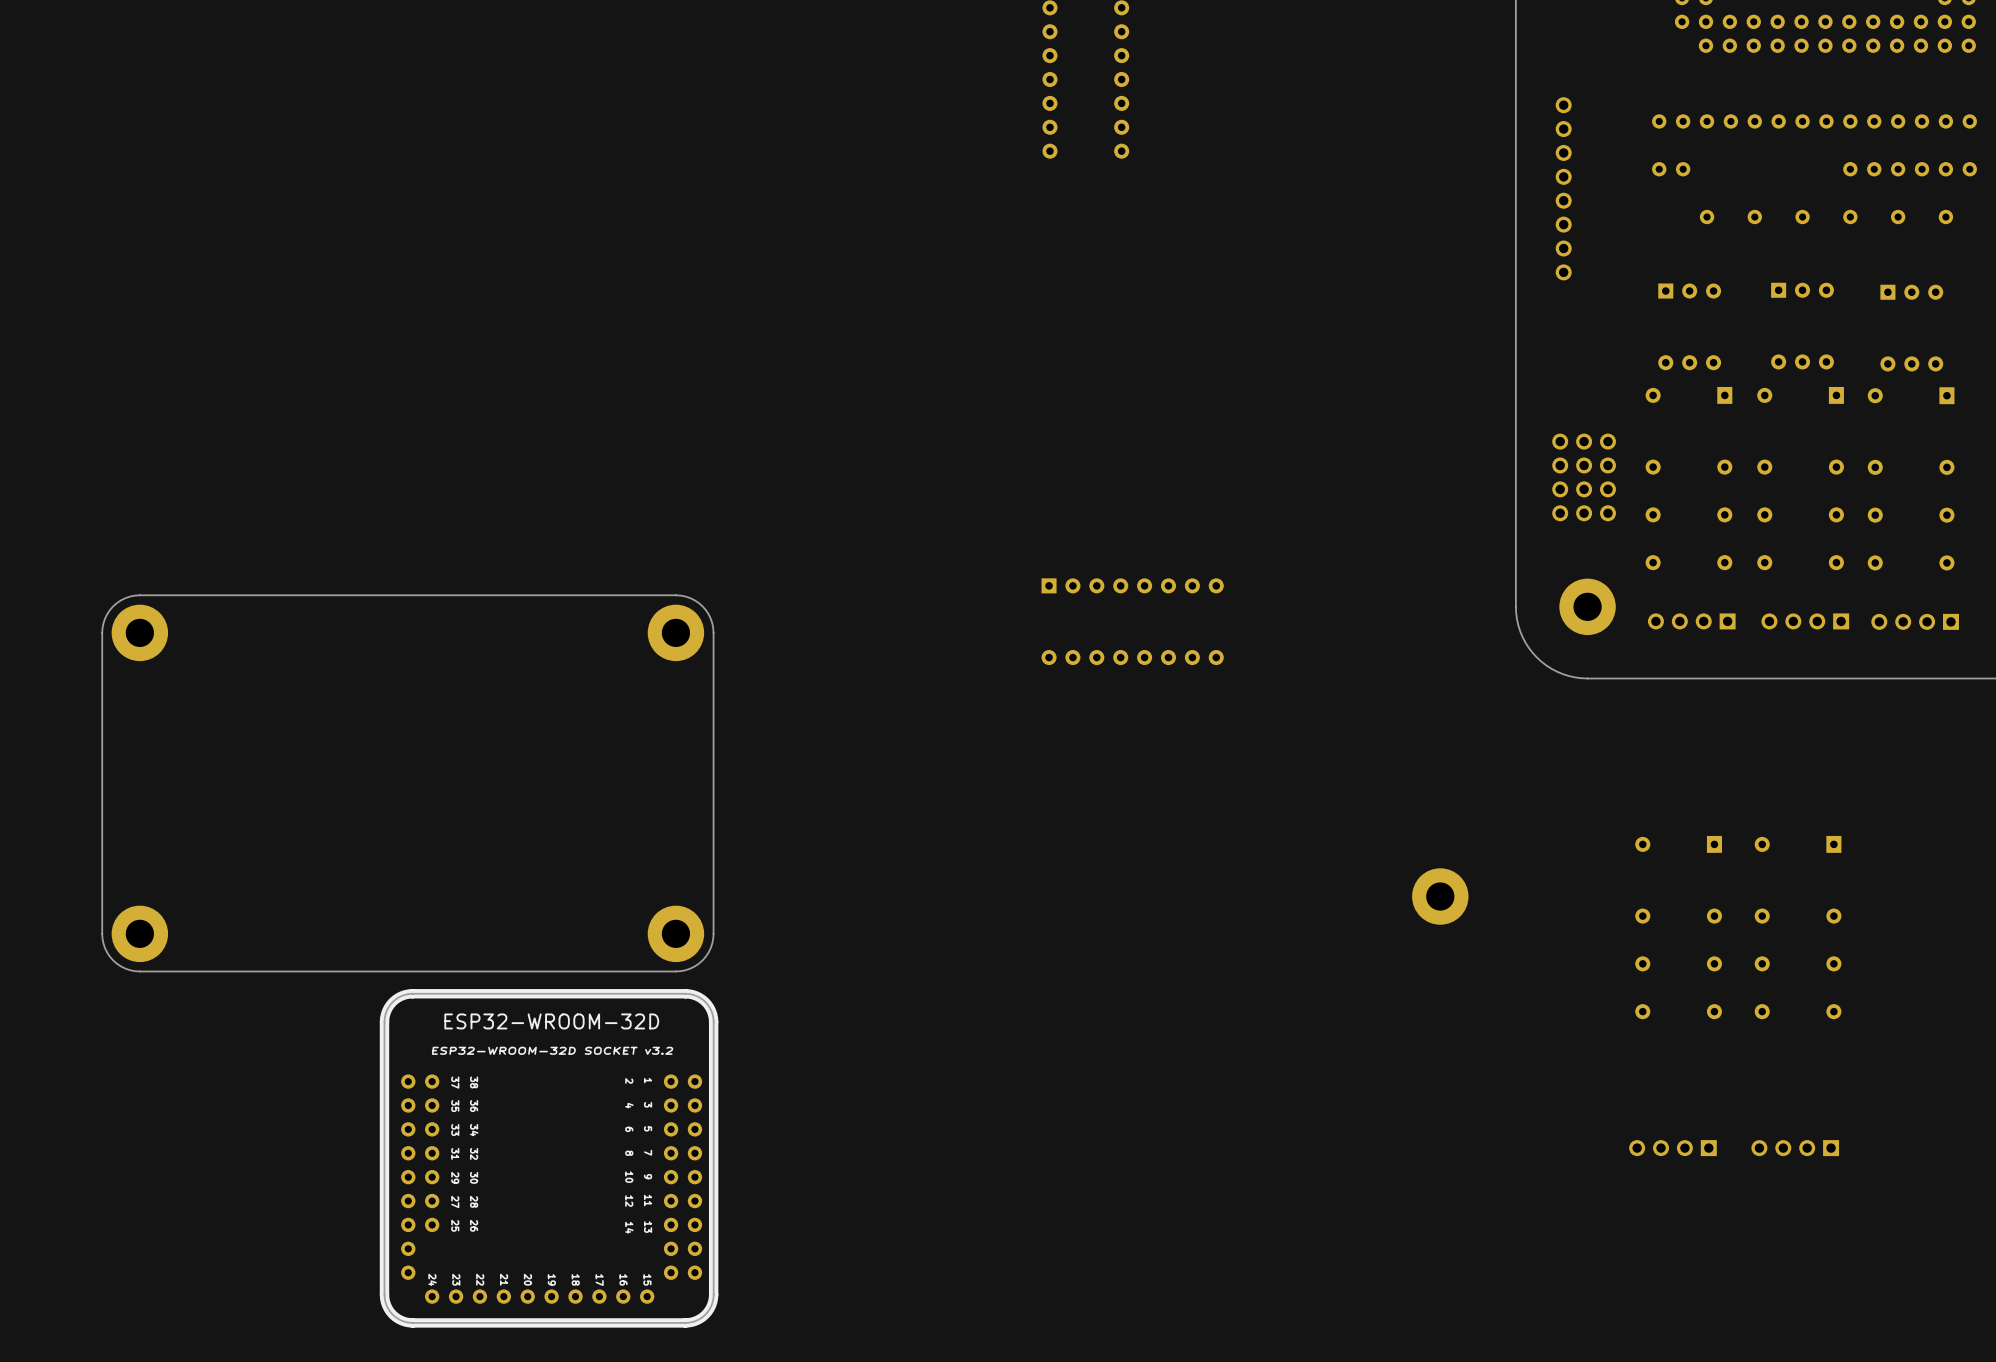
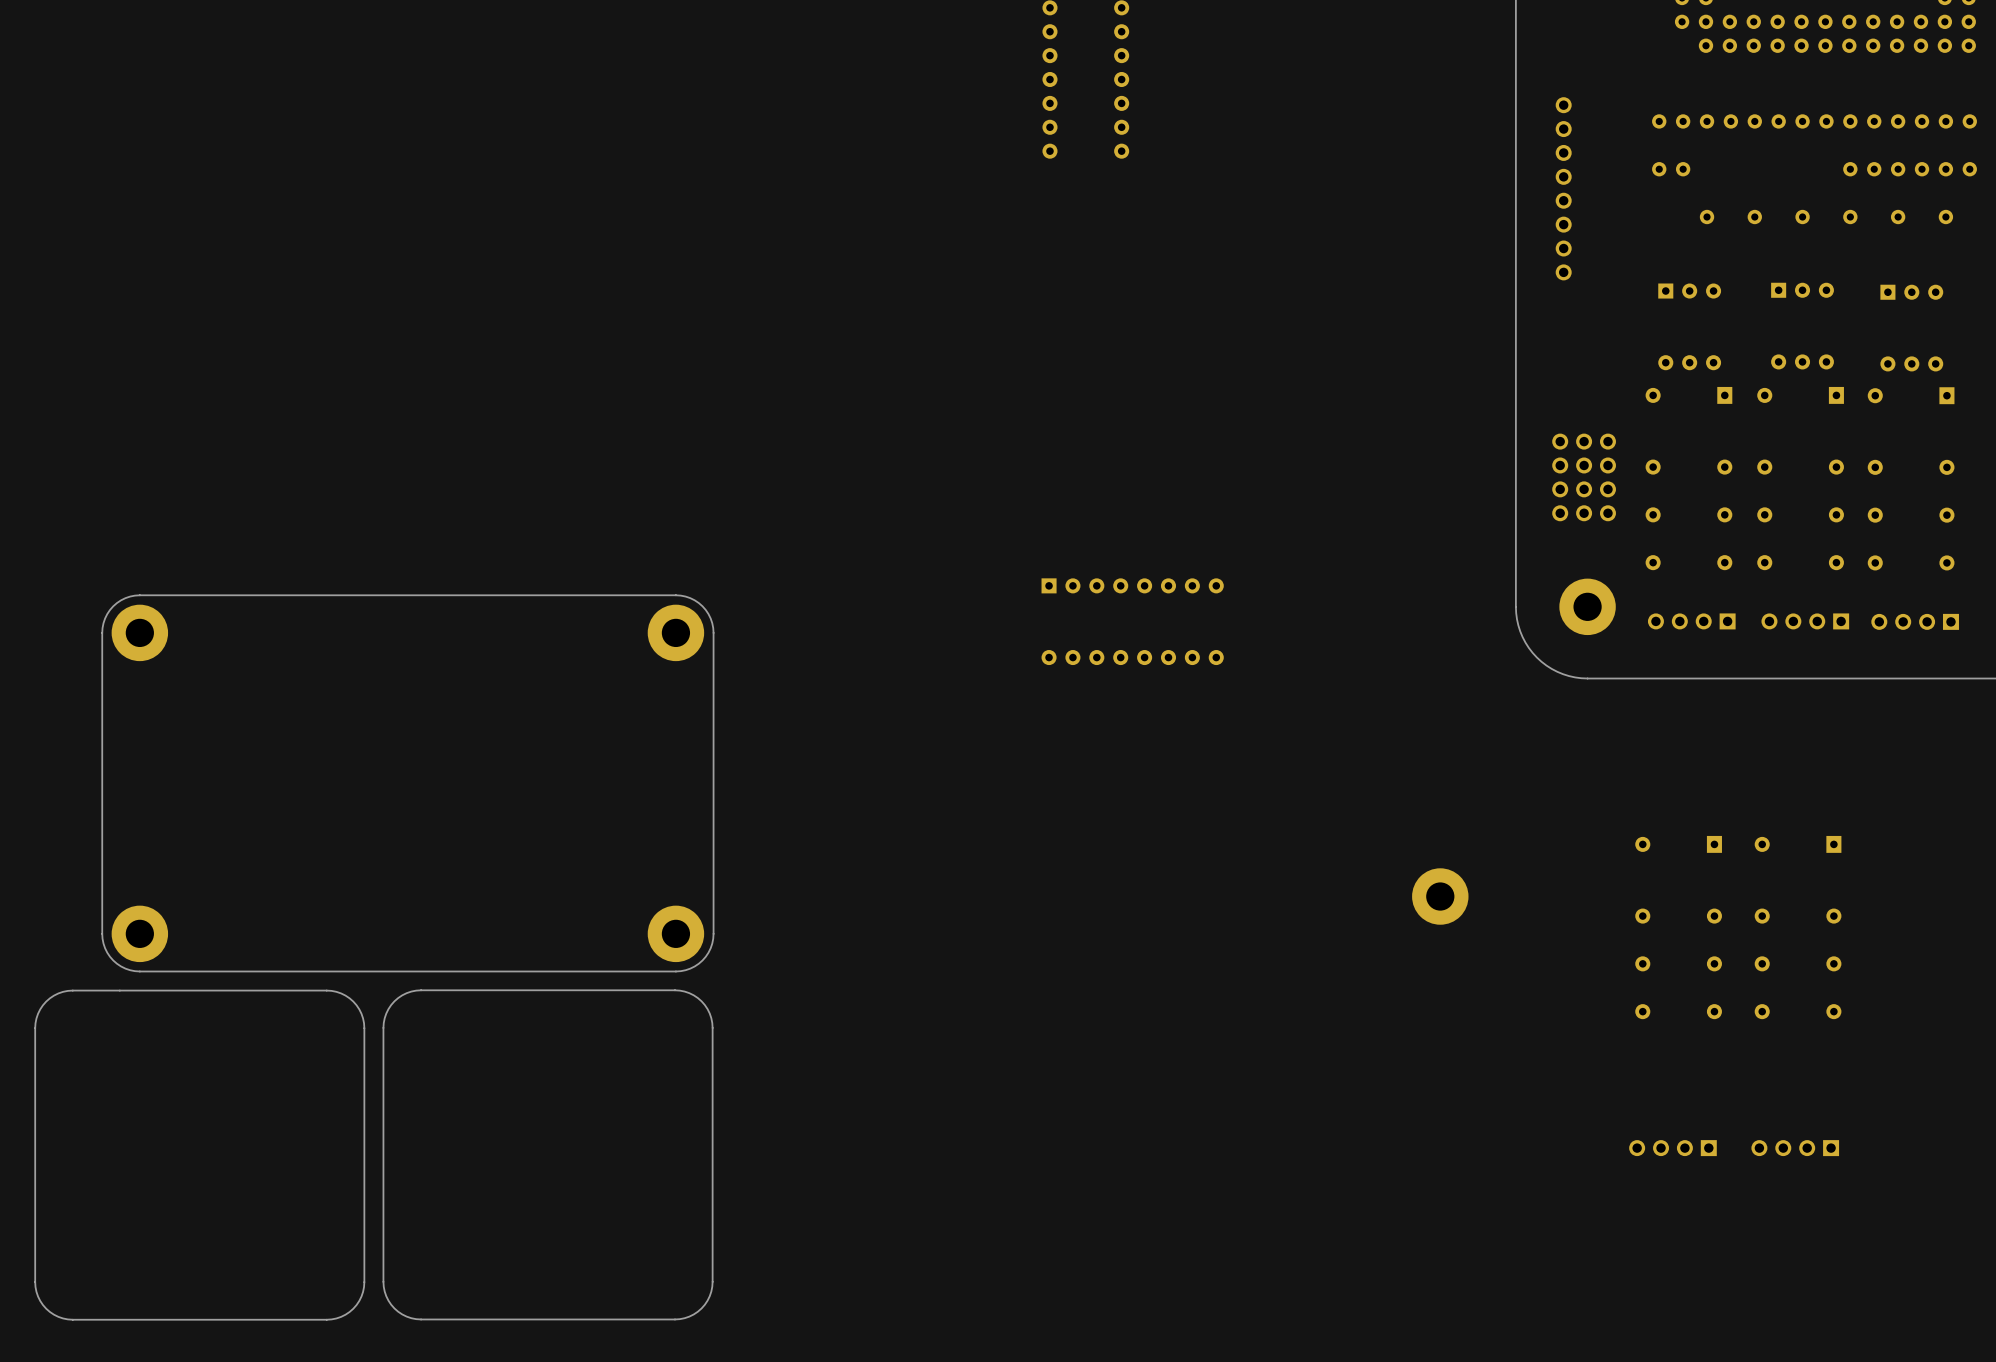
board edge: none -> (326, 990) (72, 990) (54, 995) (42, 1005) (38, 1013) (35, 1028) (35, 1282) (40, 1300) (49, 1311) (58, 1316) (72, 1319) (326, 1319) (341, 1316) (356, 1305) (361, 1296) (364, 1282) (364, 1023) (359, 1009) (353, 1001) (341, 993) (326, 990)
board edge: none -> (674, 990) (421, 990) (402, 995) (391, 1005) (384, 1018) (383, 1027) (383, 1281) (386, 1296) (398, 1311) (406, 1316) (421, 1319) (674, 1319) (693, 1314) (704, 1304) (709, 1296) (712, 1281) (712, 1023) (709, 1013) (701, 1001) (689, 993) (674, 990)
part: (549, 1158) -> none

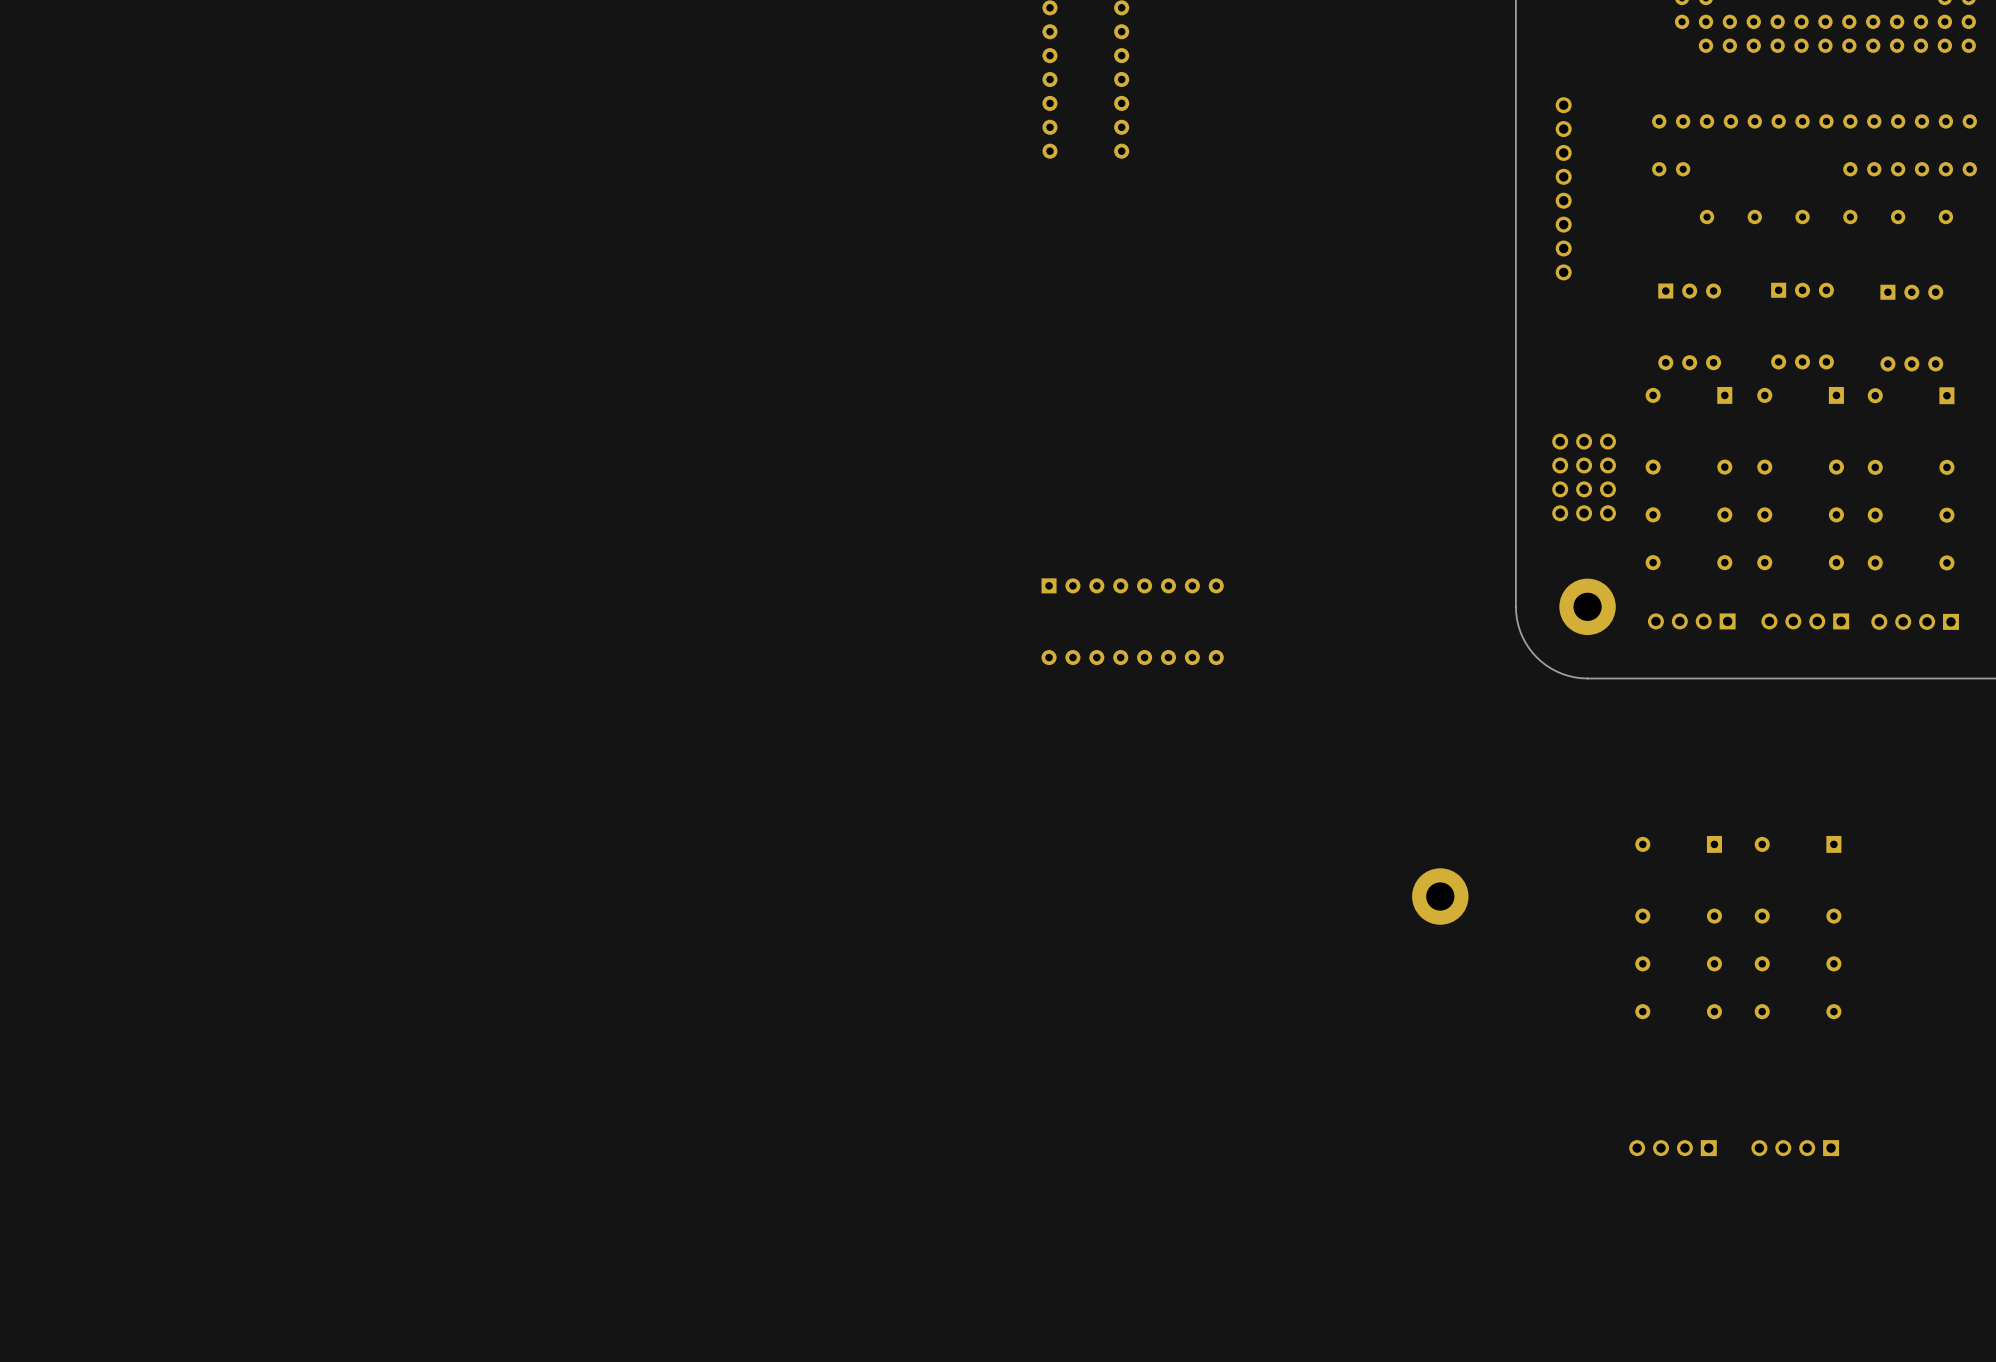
board edge: (675, 595) (139, 595) (121, 600) (107, 614) (102, 632) (102, 933) (107, 952) (121, 966) (139, 971) (675, 971) (694, 966) (708, 952) (713, 933) (713, 632) (710, 618) (702, 606) (690, 598) (675, 595) -> none
part: (139, 632) -> none
part: (675, 632) -> none
part: (139, 933) -> none
part: (675, 933) -> none
board edge: (326, 990) (72, 990) (54, 995) (42, 1005) (38, 1013) (35, 1028) (35, 1282) (40, 1300) (49, 1311) (58, 1316) (72, 1319) (326, 1319) (341, 1316) (356, 1305) (361, 1296) (364, 1282) (364, 1023) (359, 1009) (353, 1001) (341, 993) (326, 990) -> none
board edge: (674, 990) (421, 990) (402, 995) (391, 1005) (384, 1018) (383, 1027) (383, 1281) (386, 1296) (398, 1311) (406, 1316) (421, 1319) (674, 1319) (693, 1314) (704, 1304) (709, 1296) (712, 1281) (712, 1023) (709, 1013) (701, 1001) (689, 993) (674, 990) -> none

